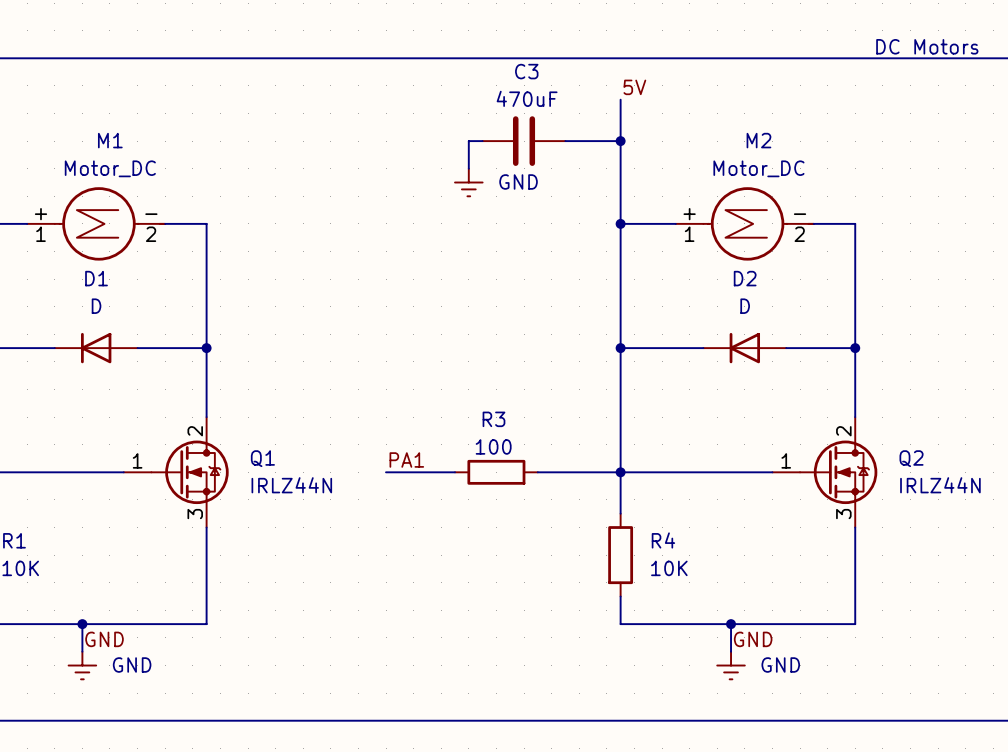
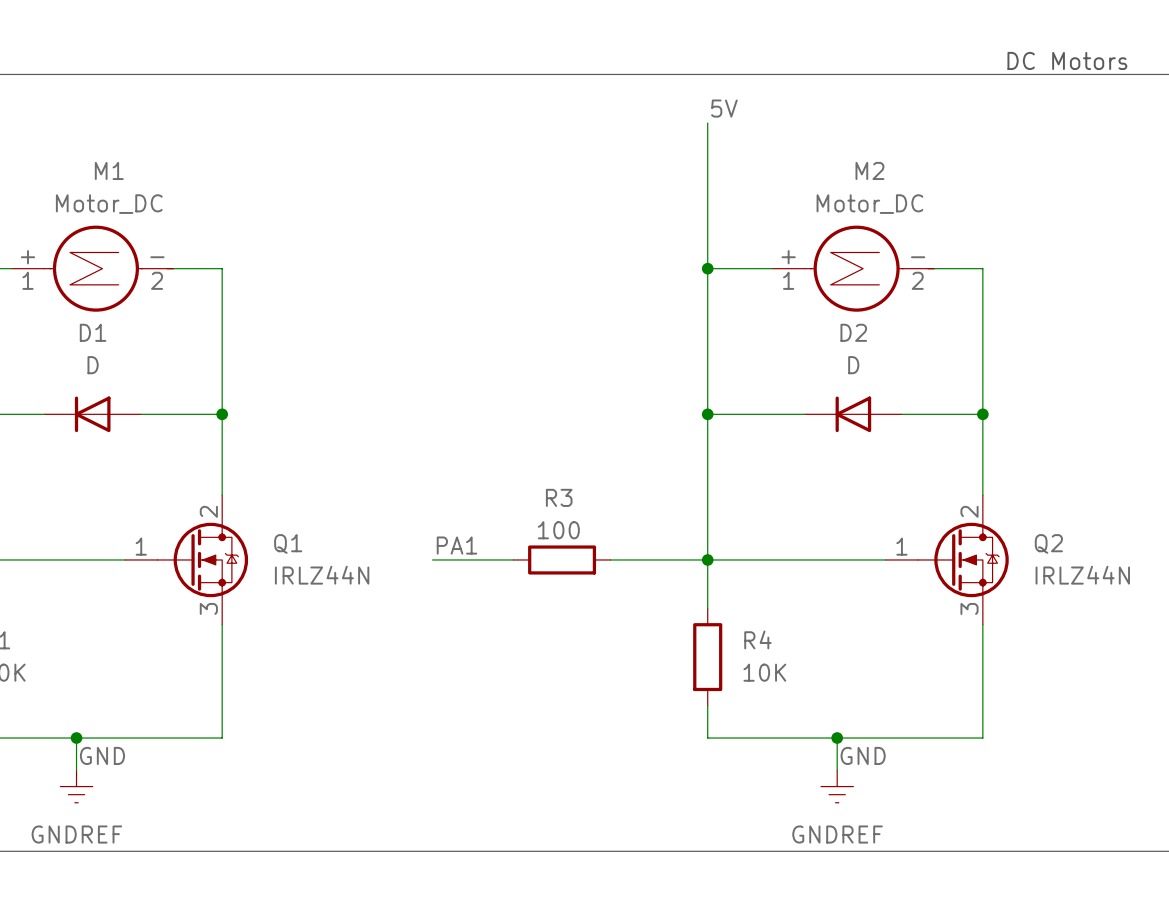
wire: (482, 141) (468, 141) (468, 168) -> none
C3: 470uF (524, 141) -> none
wire: (565, 141) (620, 141) -> none
junction: (620, 141) -> none
power symbol: GND (468, 182) -> none
power symbol: GND (82, 665) -> GNDREF (76, 786)
power symbol: GND (731, 665) -> GNDREF (837, 786)

